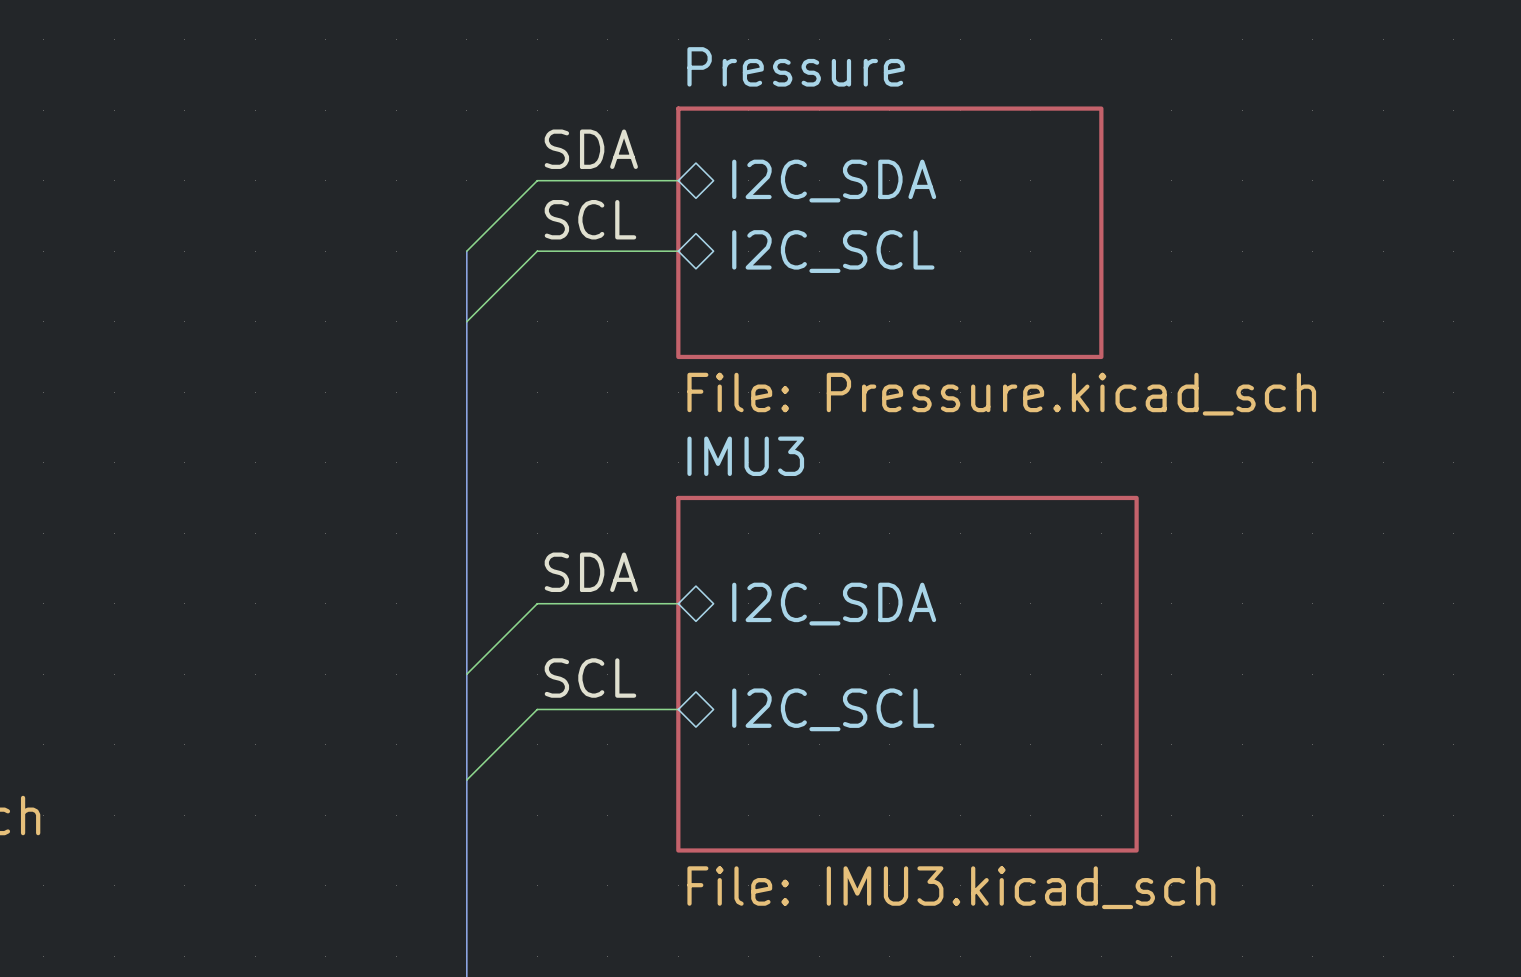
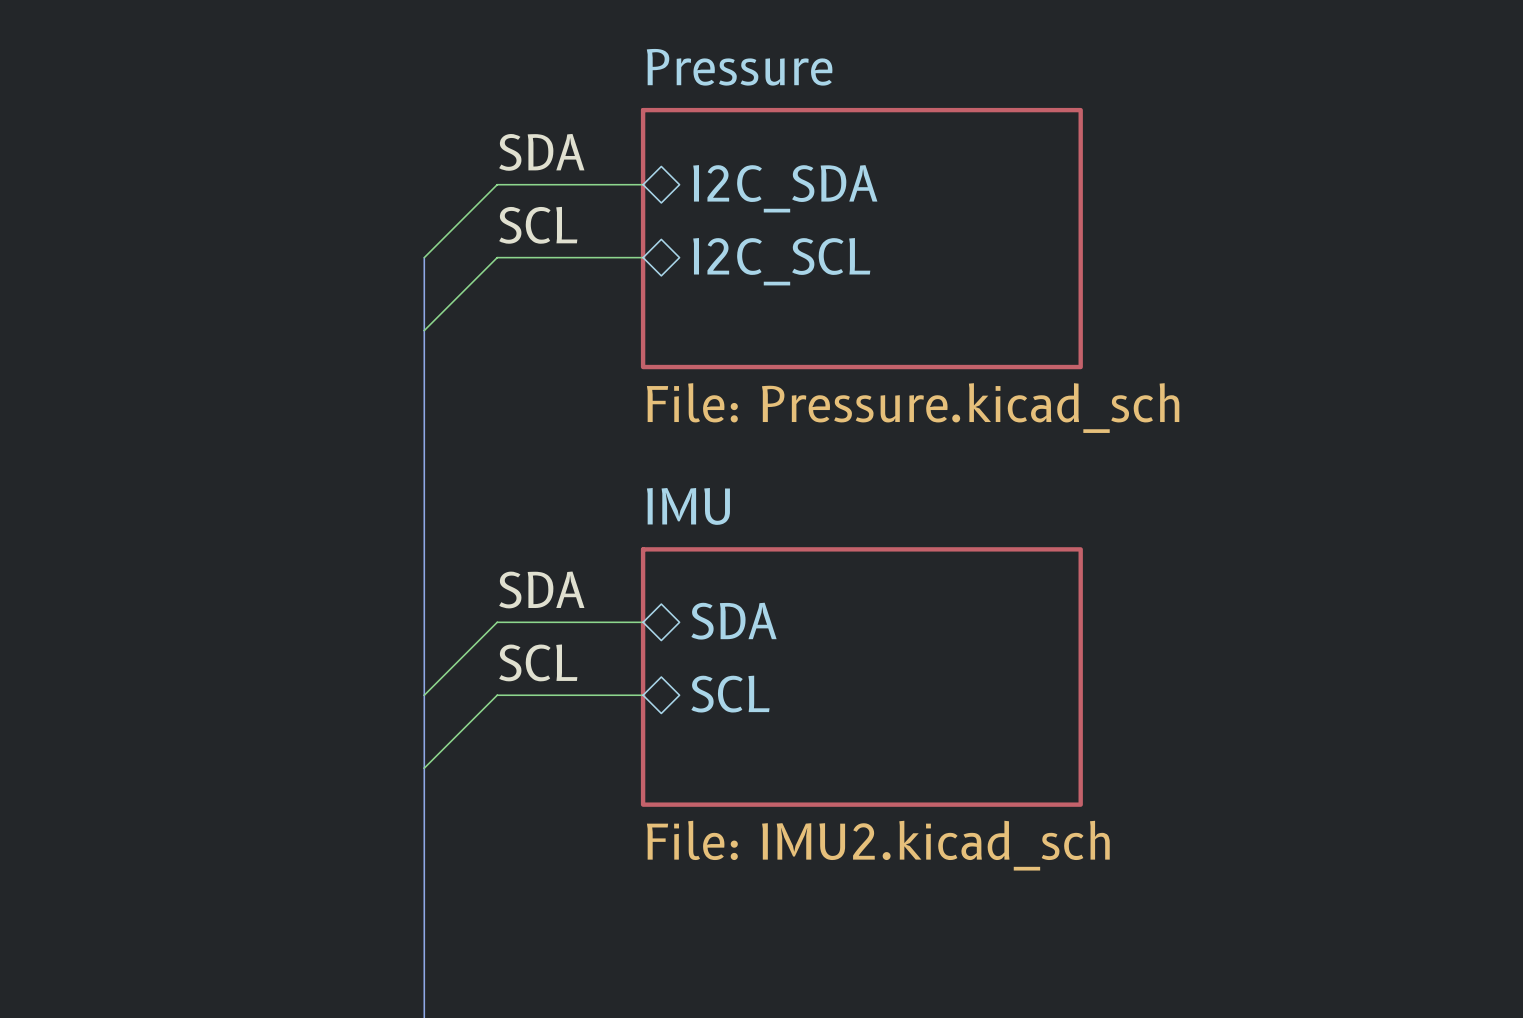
sheet pin: I2C_SDA (834, 604) -> SDA (733, 621)
sheet IMU: none -> File: IMU2.kicad_sch (861, 677)
sheet pin: none -> SCL (730, 694)
sheet IMU3: File: IMU3.kicad_sch (907, 674) -> none
label position: SCL (590, 678) -> SCL (538, 662)
wire: (678, 709) (537, 709) (466, 779) -> (643, 695) (497, 695) (424, 768)
sheet pin: I2C_SCL (833, 709) -> none

